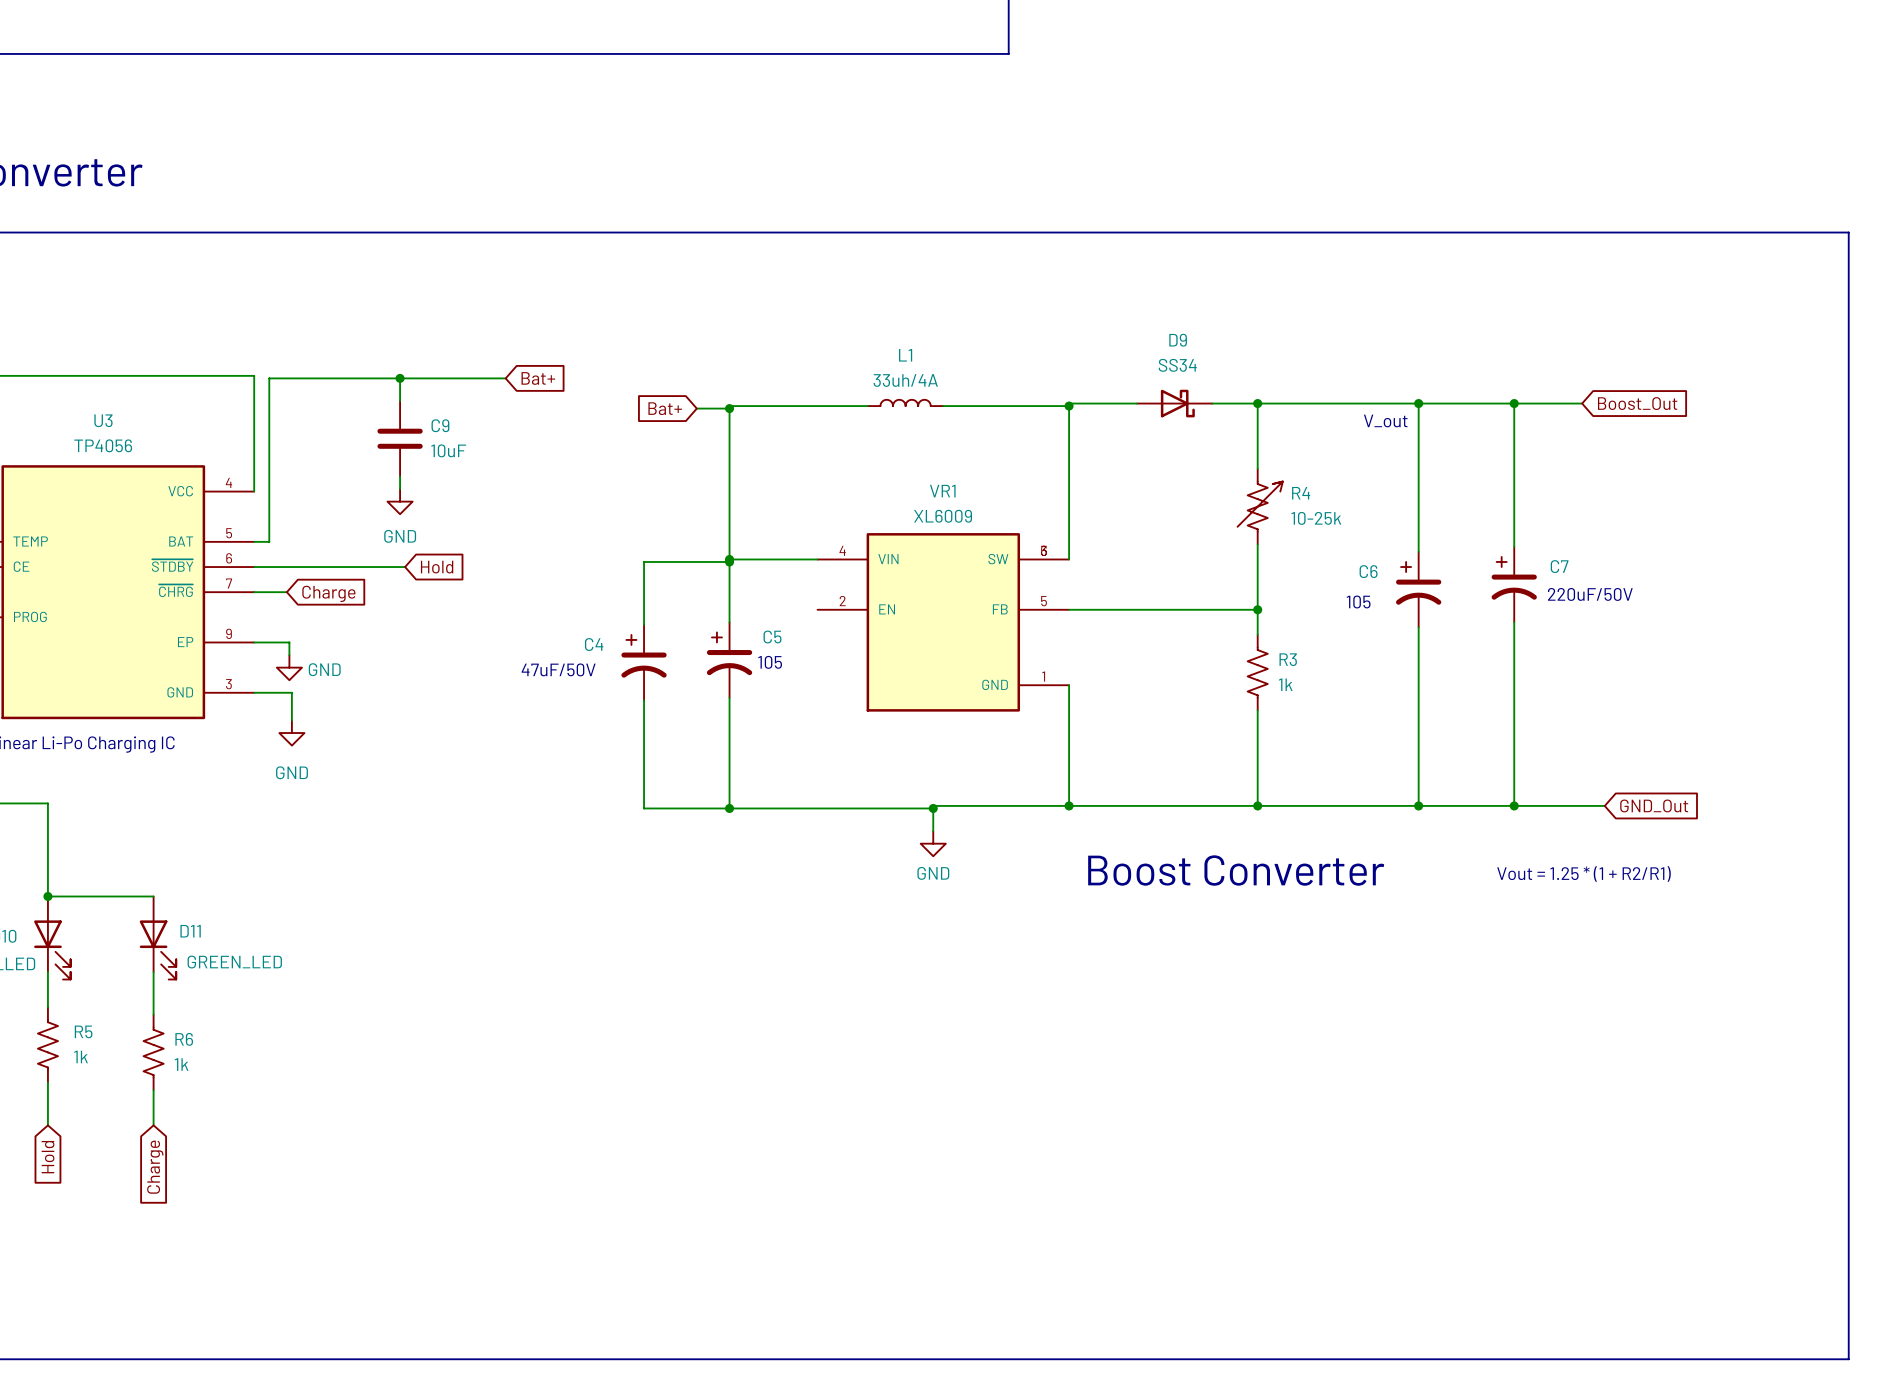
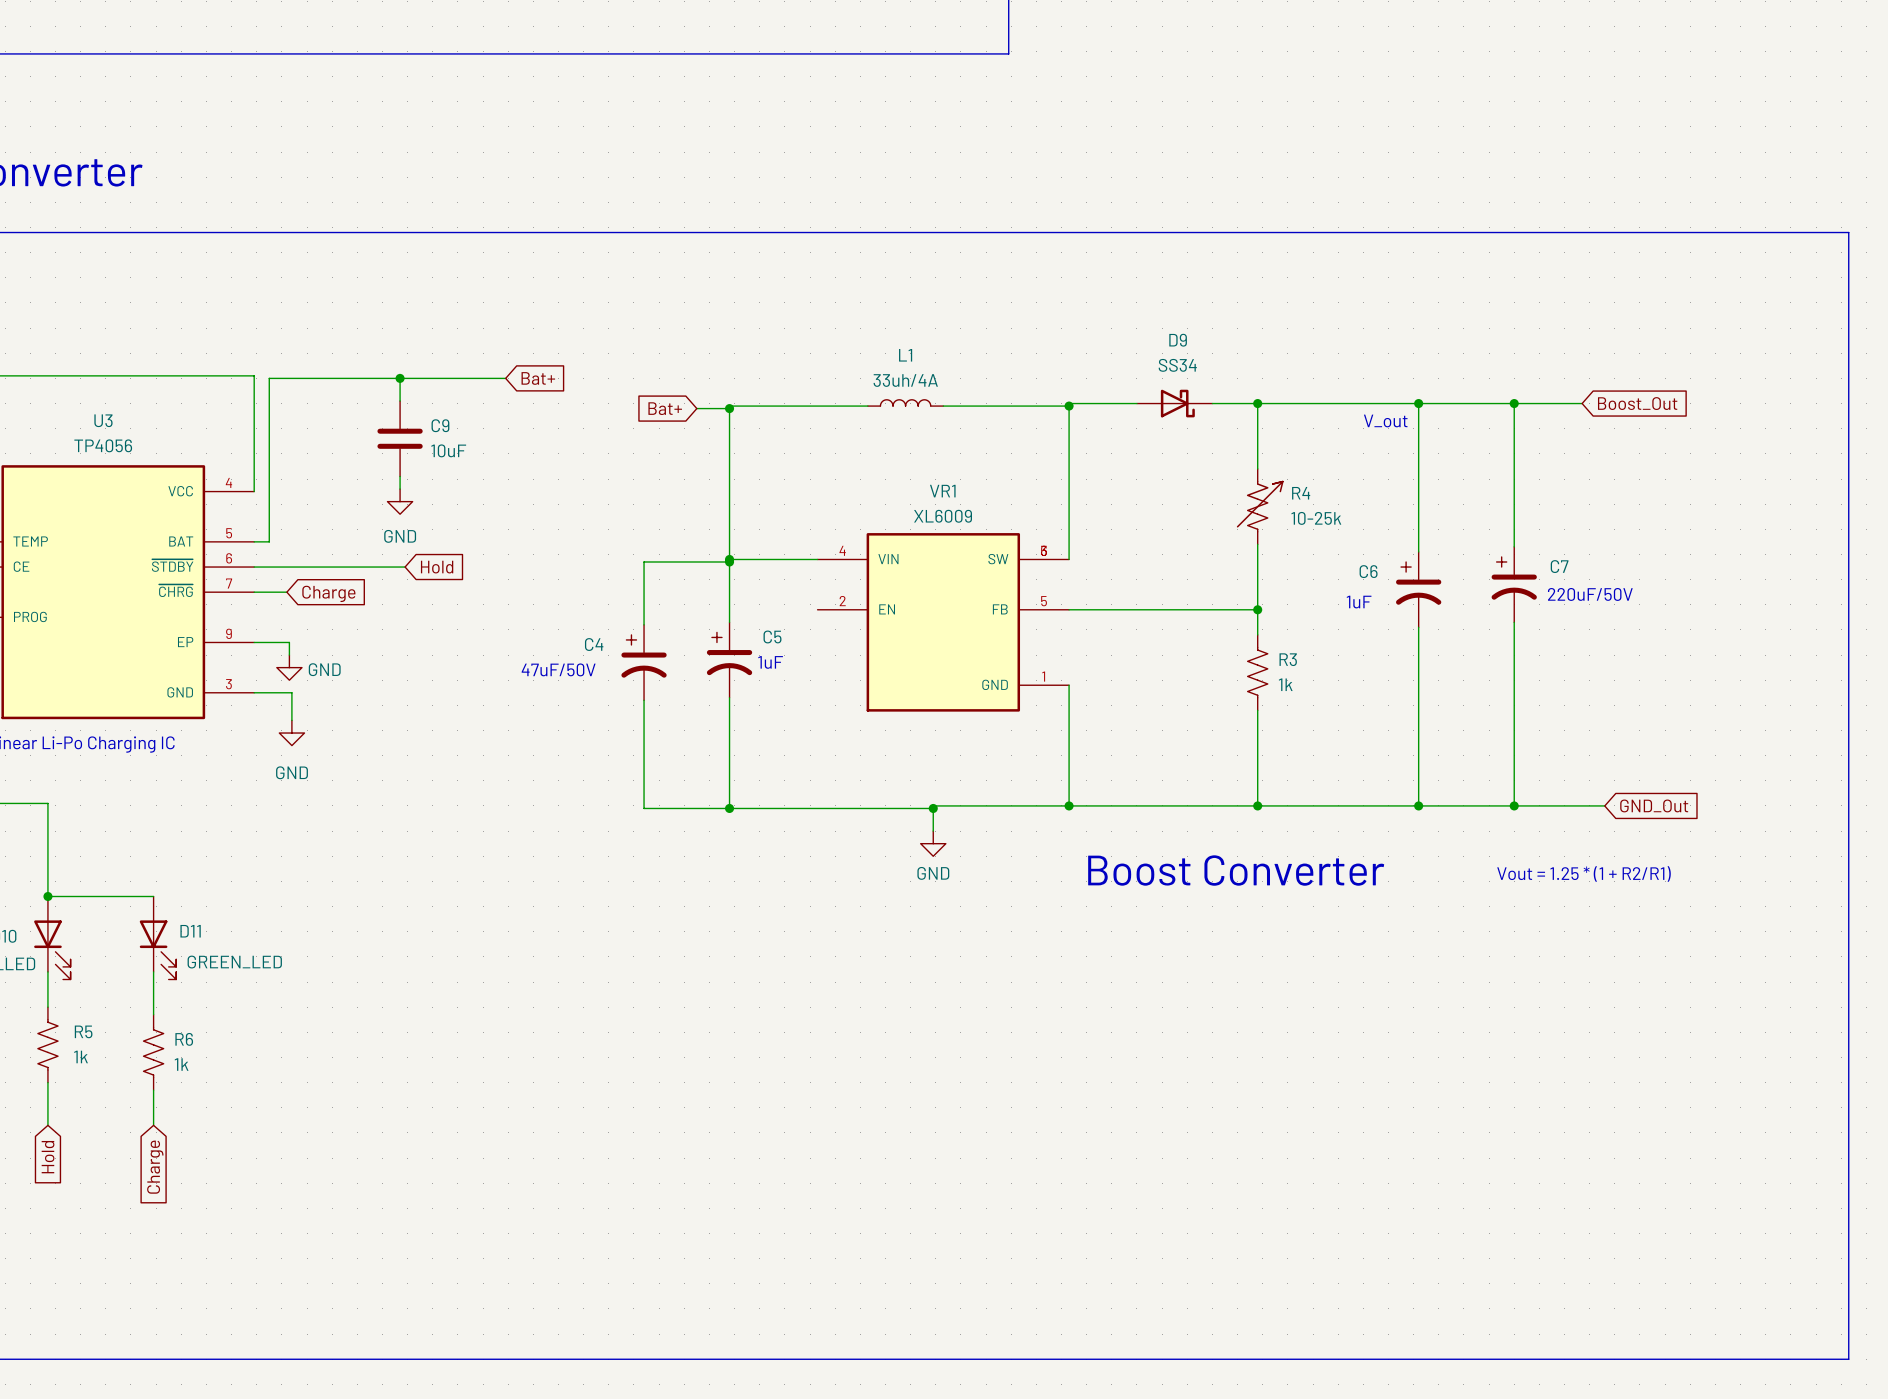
text: 105 (1358, 602) -> 1uF (1359, 602)
text: 105 (770, 662) -> 1uF (770, 662)

